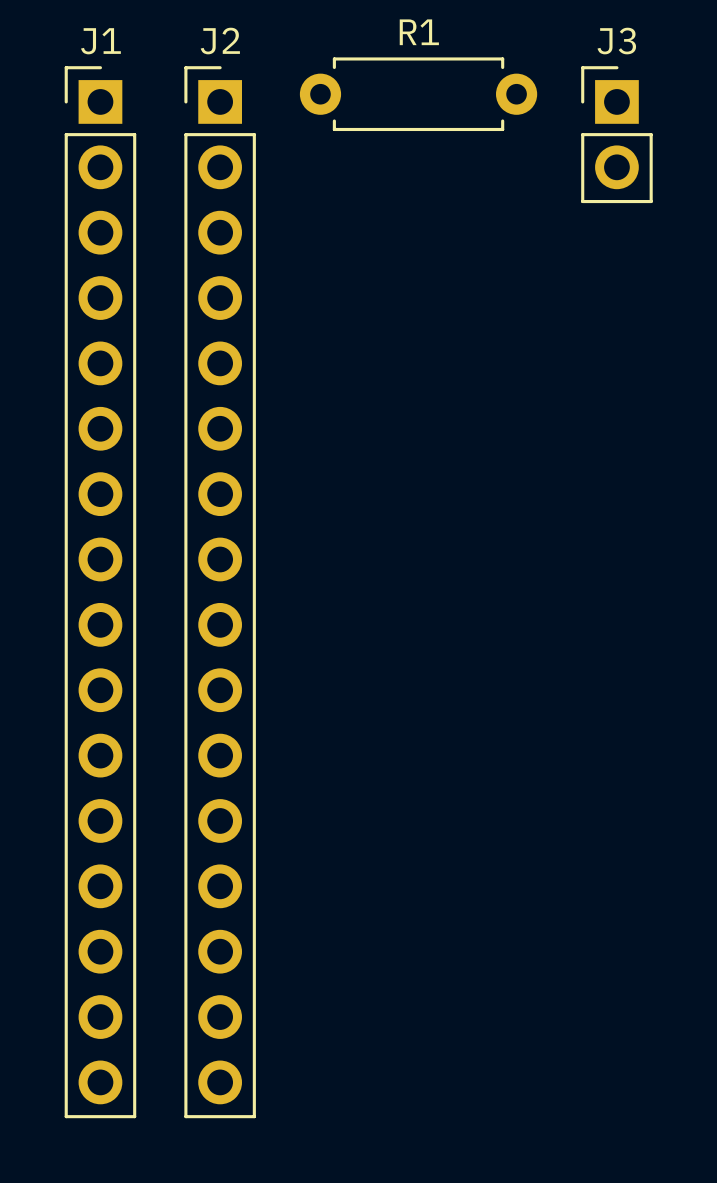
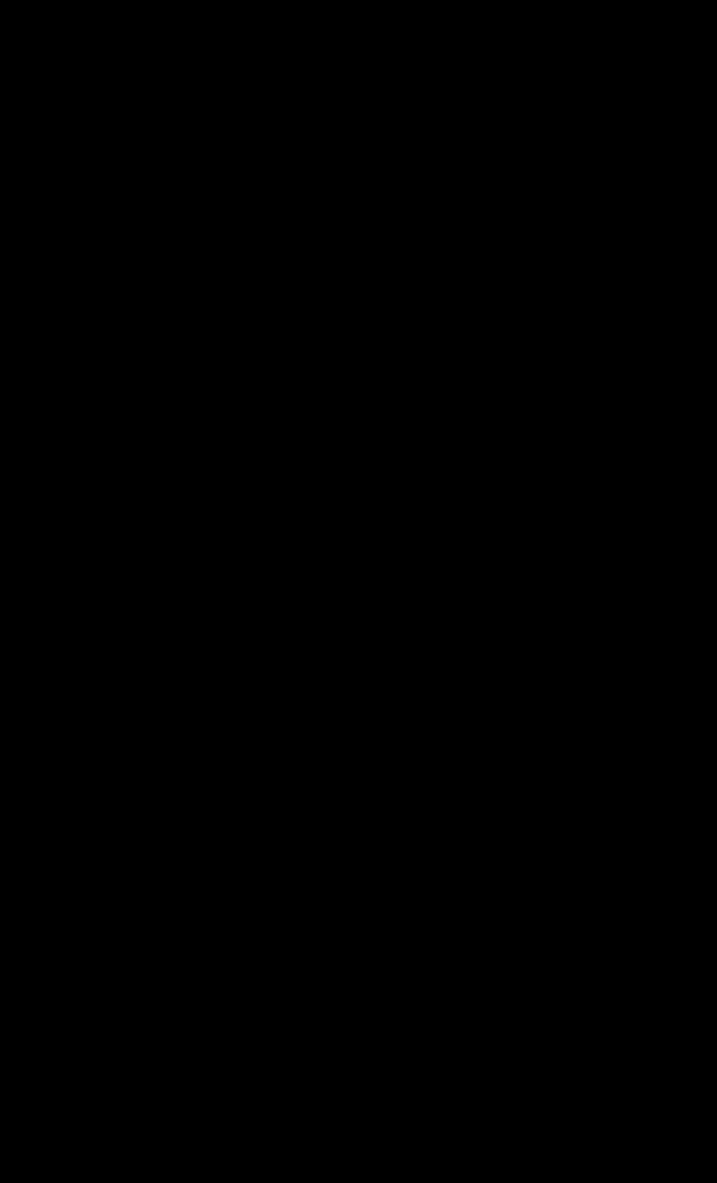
R1: (418, 94) -> none
J3: (616, 134) -> none
J1: (100, 592) -> none
J2: (220, 592) -> none

